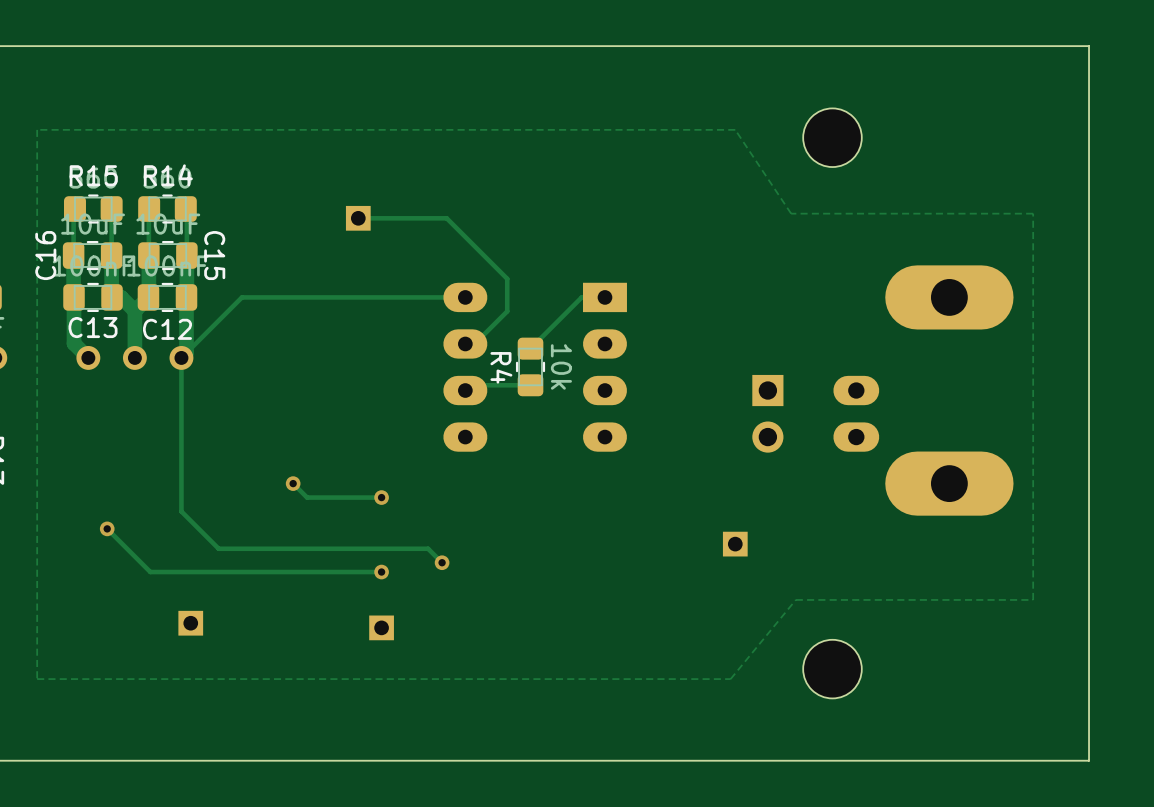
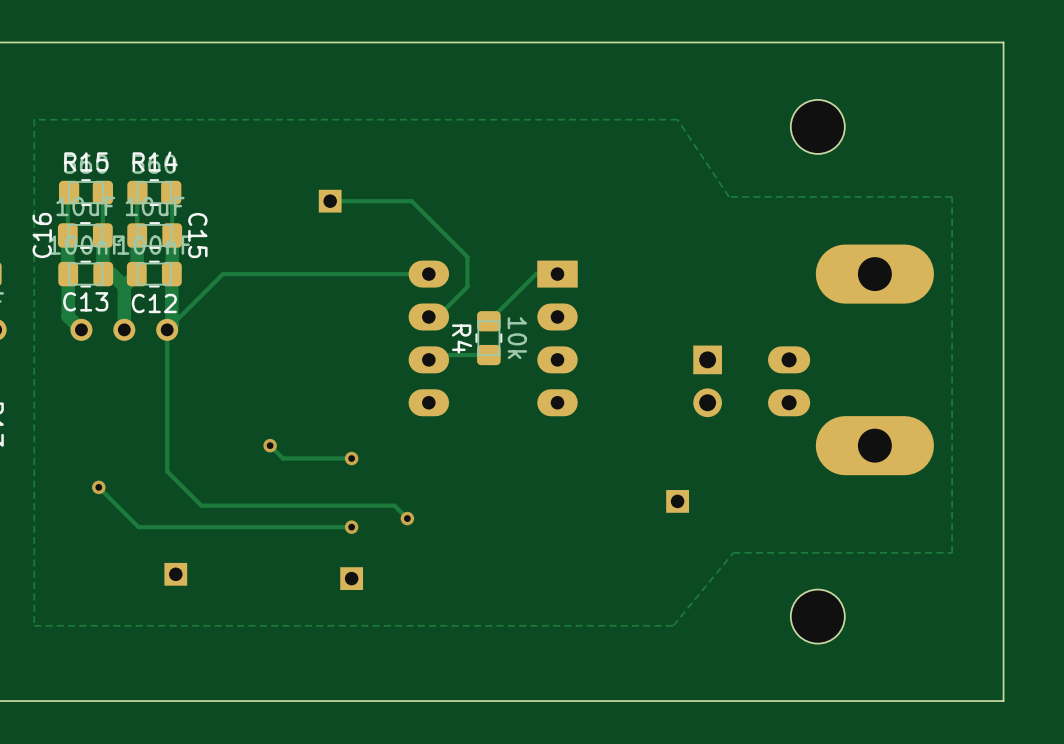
part position: (832, 137) -> (817, 126)
part position: (832, 669) -> (817, 616)

